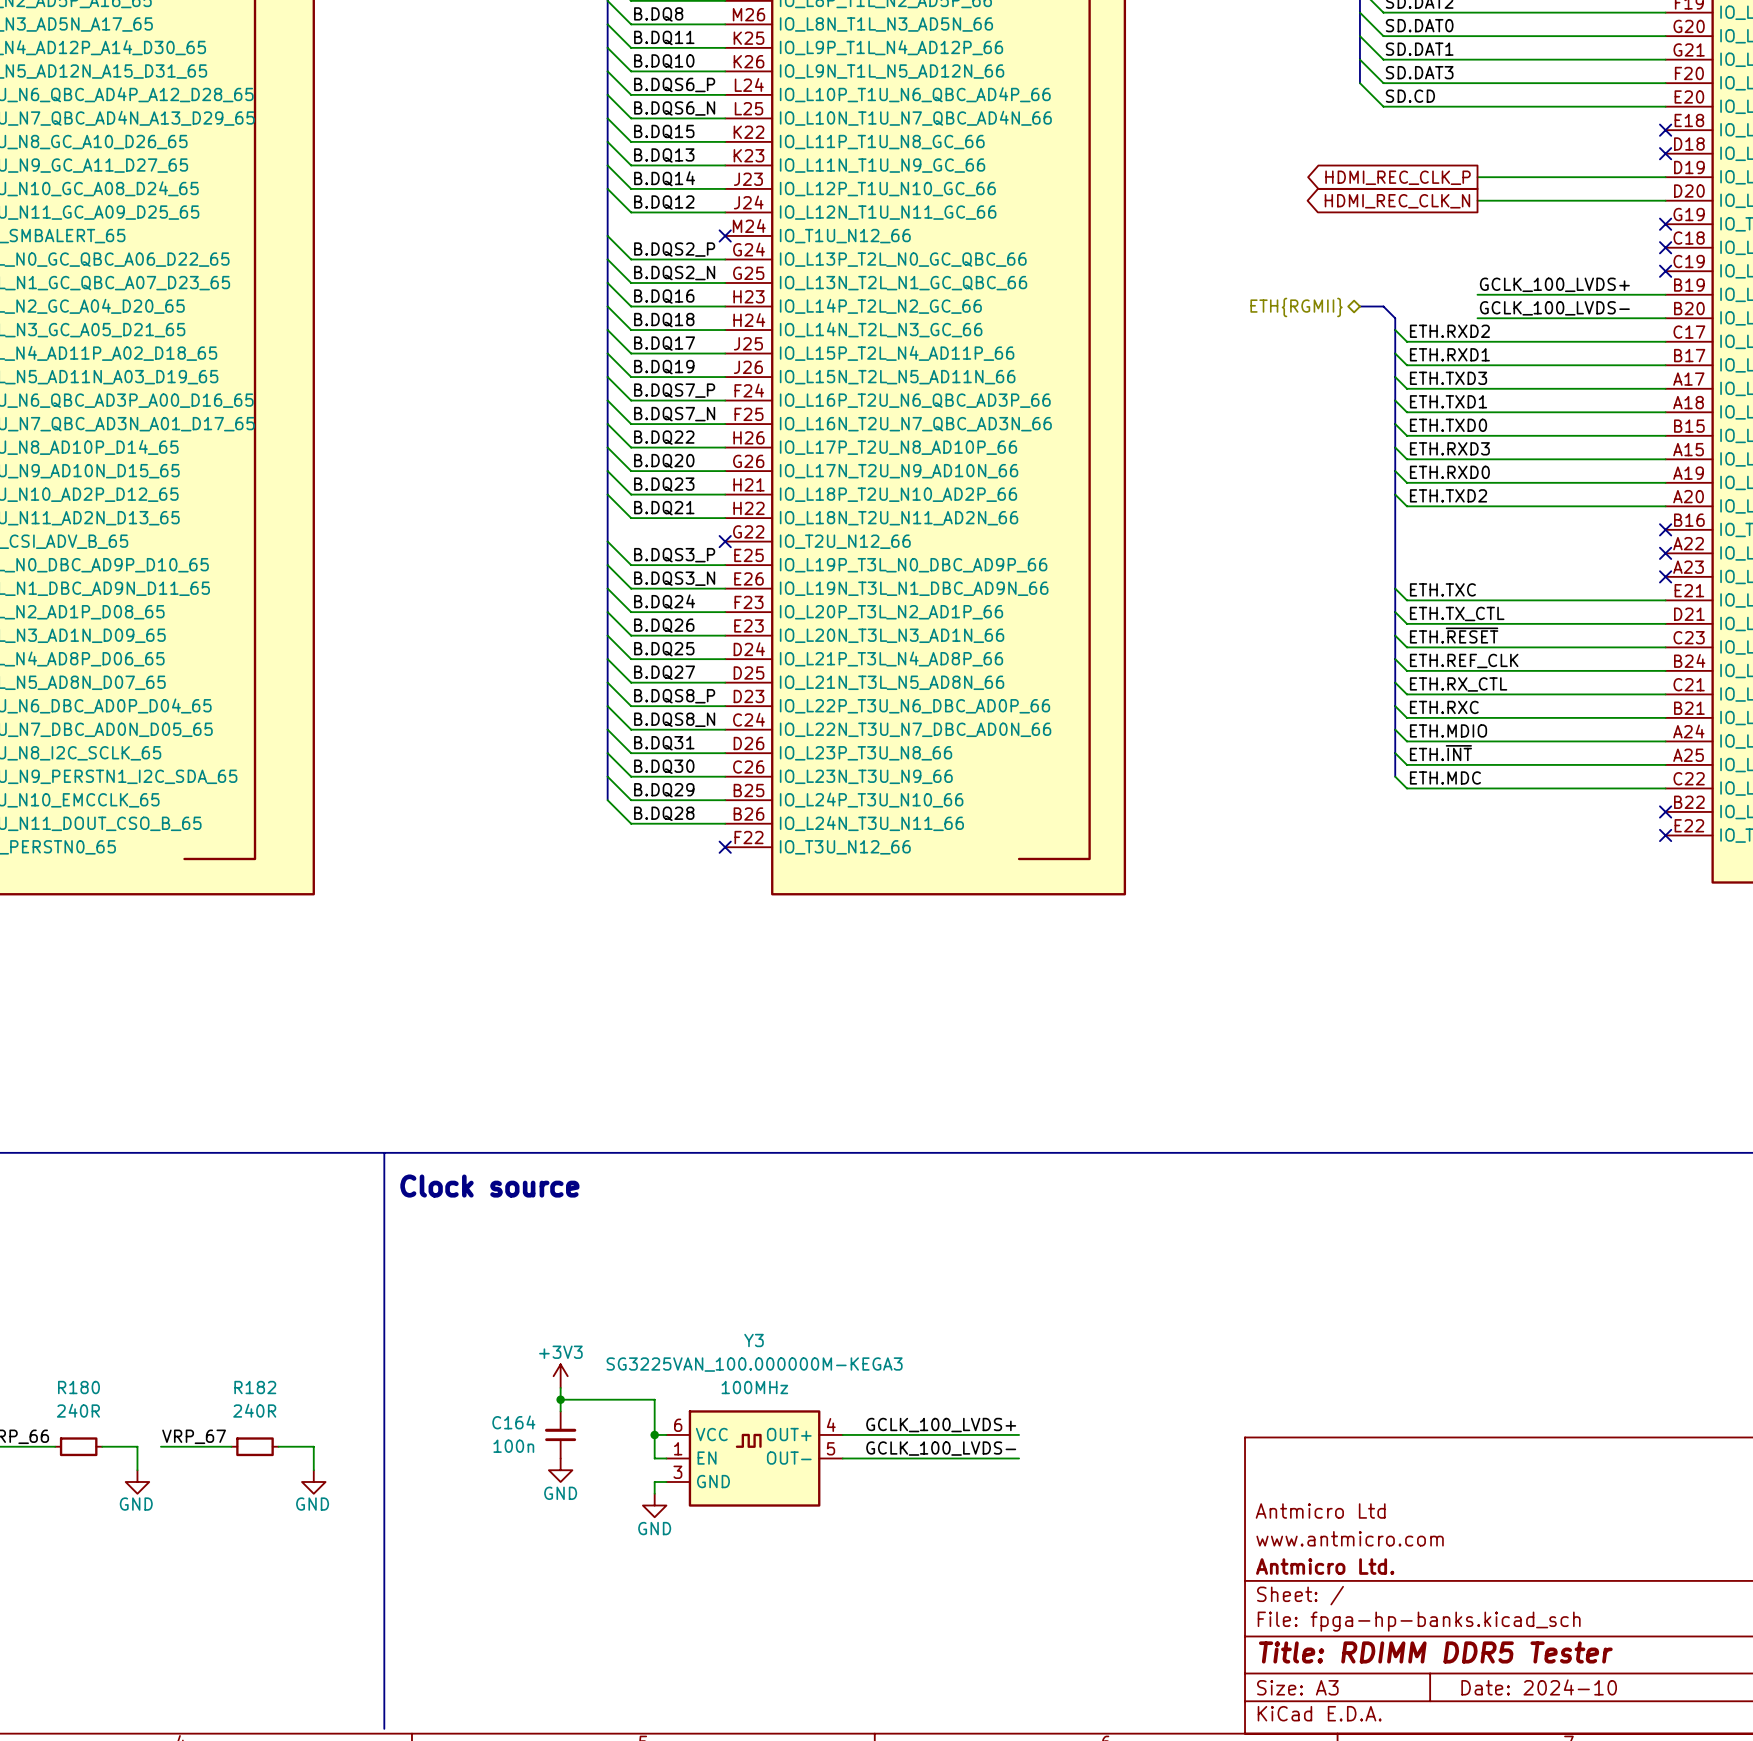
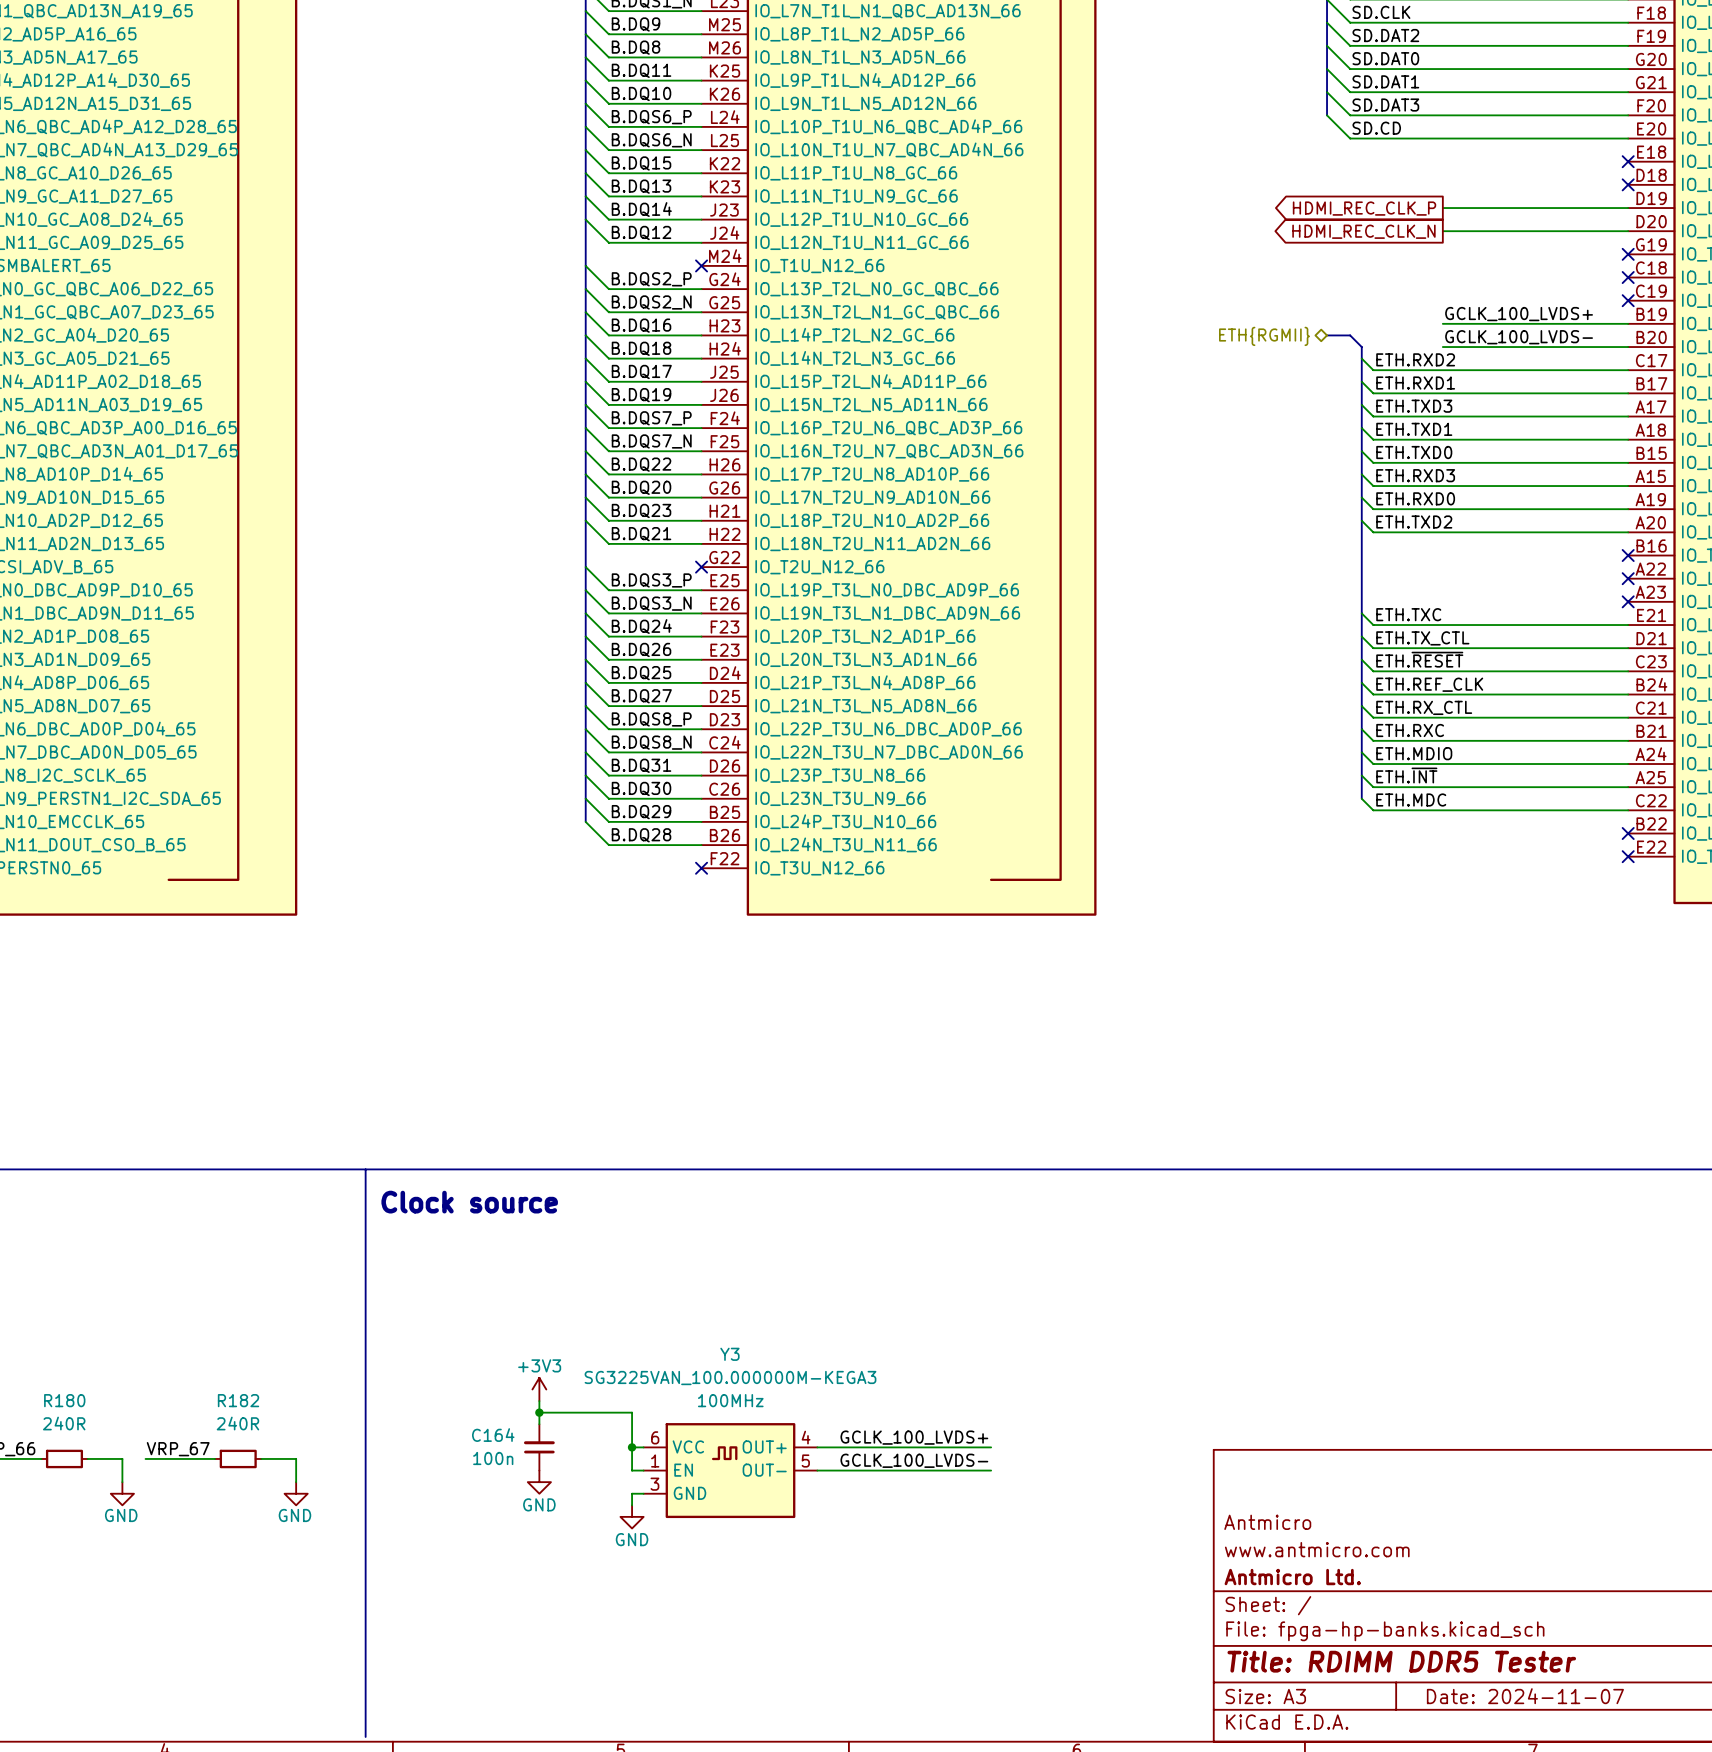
title block: Antmicro Ltd (1320, 1511) -> Antmicro (1267, 1522)
title block: Date: 2024-10 (1539, 1687) -> Date: 2024-11-07 (1525, 1696)

